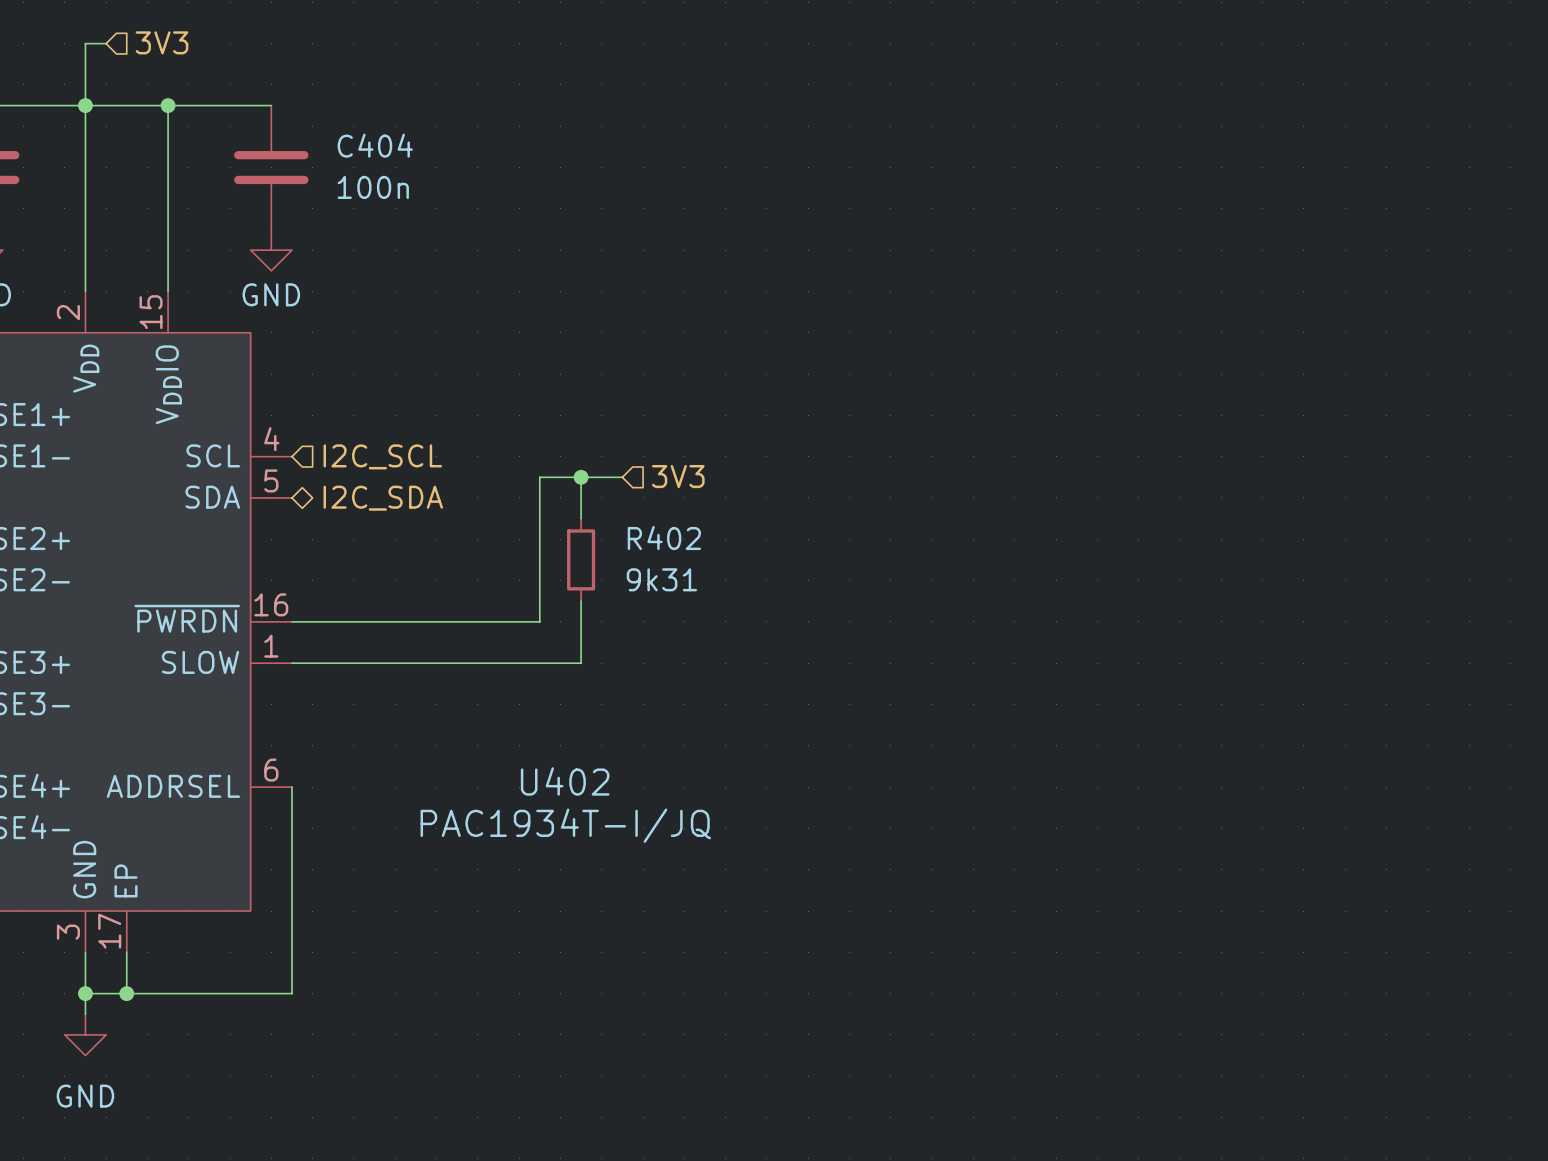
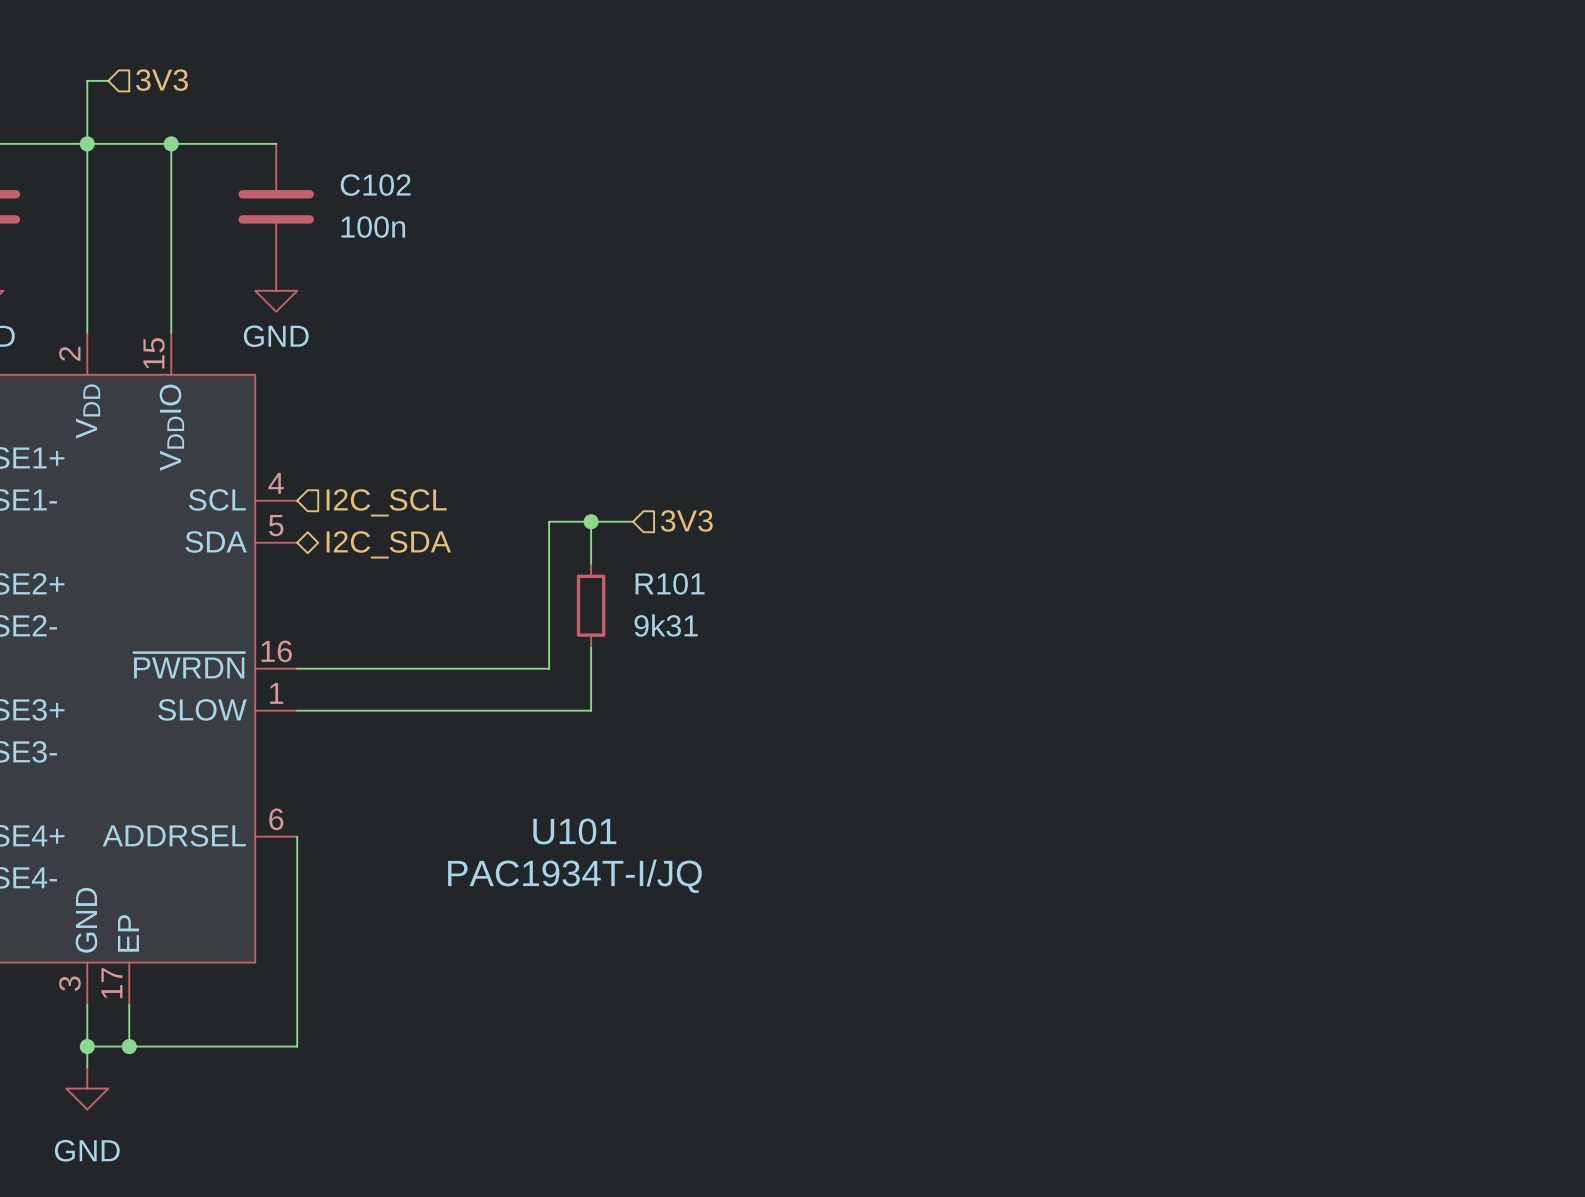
C404 name: C404 (375, 145) -> C102 (375, 185)
R402 name: R402 (664, 538) -> R101 (670, 583)
U402 name: U402 (565, 781) -> U101 (574, 831)

